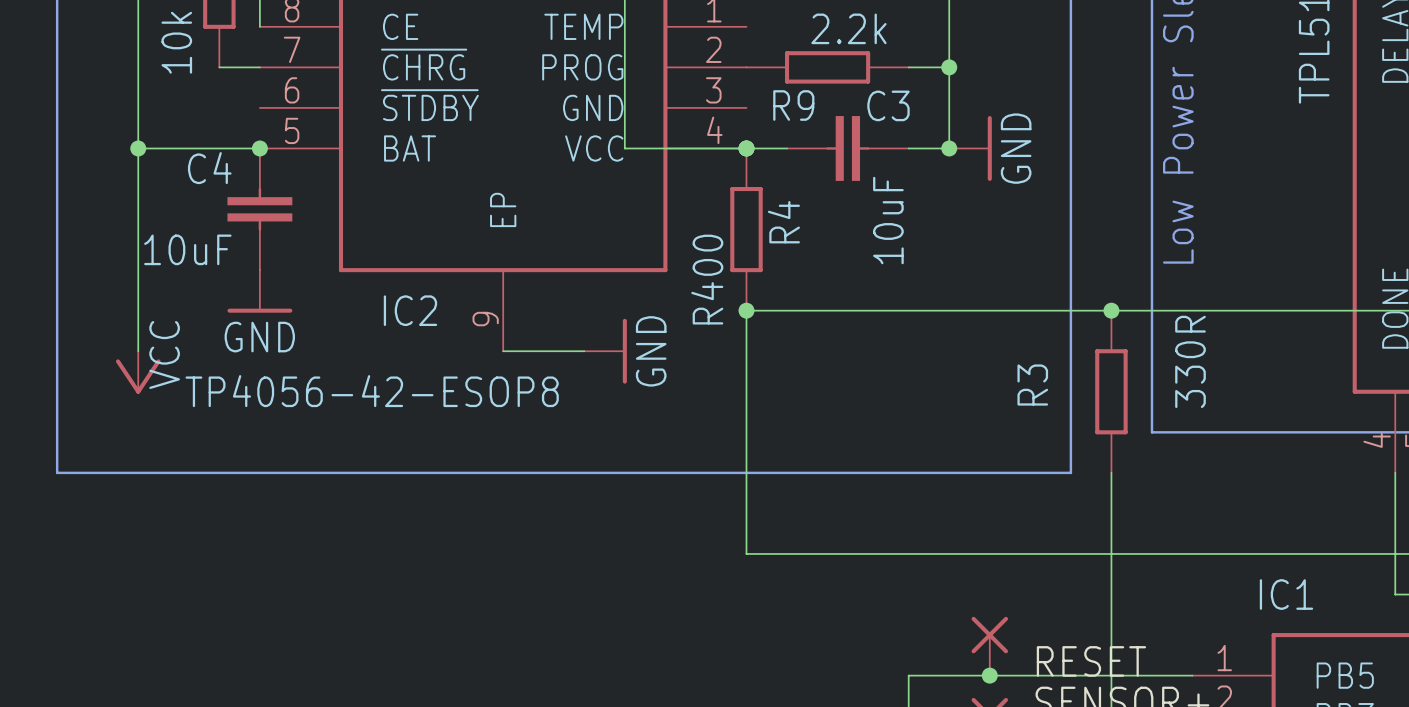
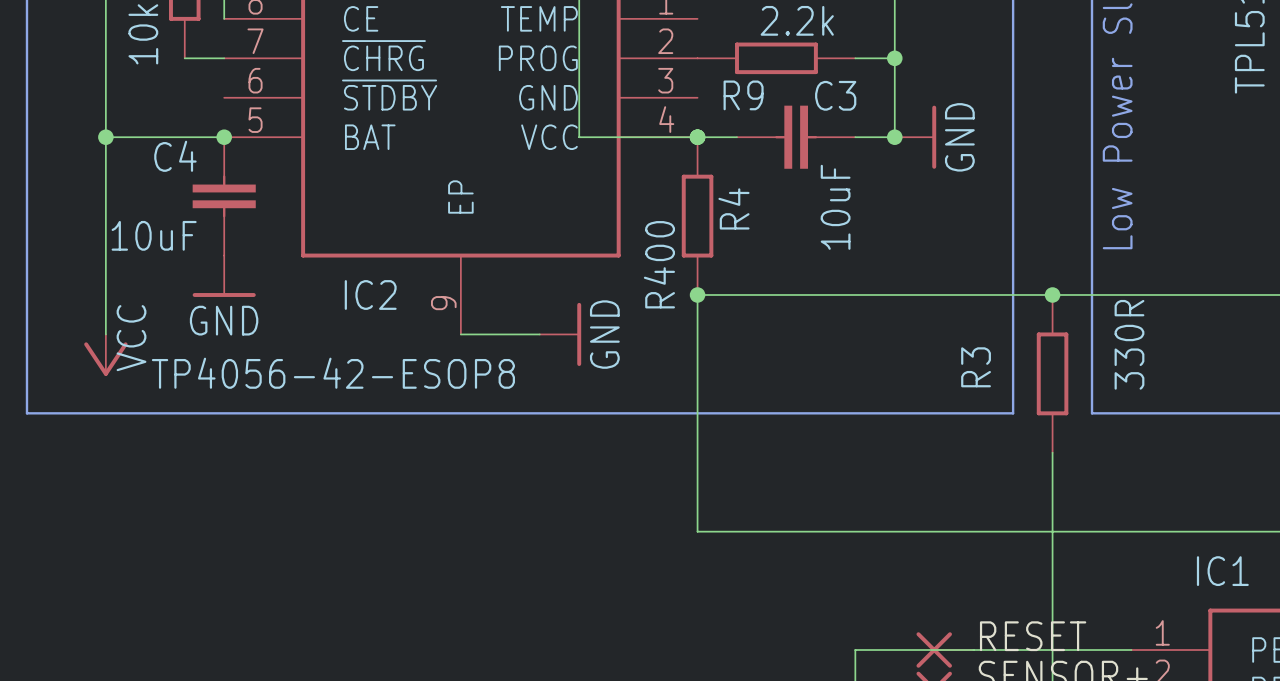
line: (57, 432) (57, 472) (1070, 472) (1070, 432) -> (26, 413) (1013, 413)
part rotation: 0° (989, 635) -> 90° counterclockwise (934, 650)
junction: (989, 675) -> none

